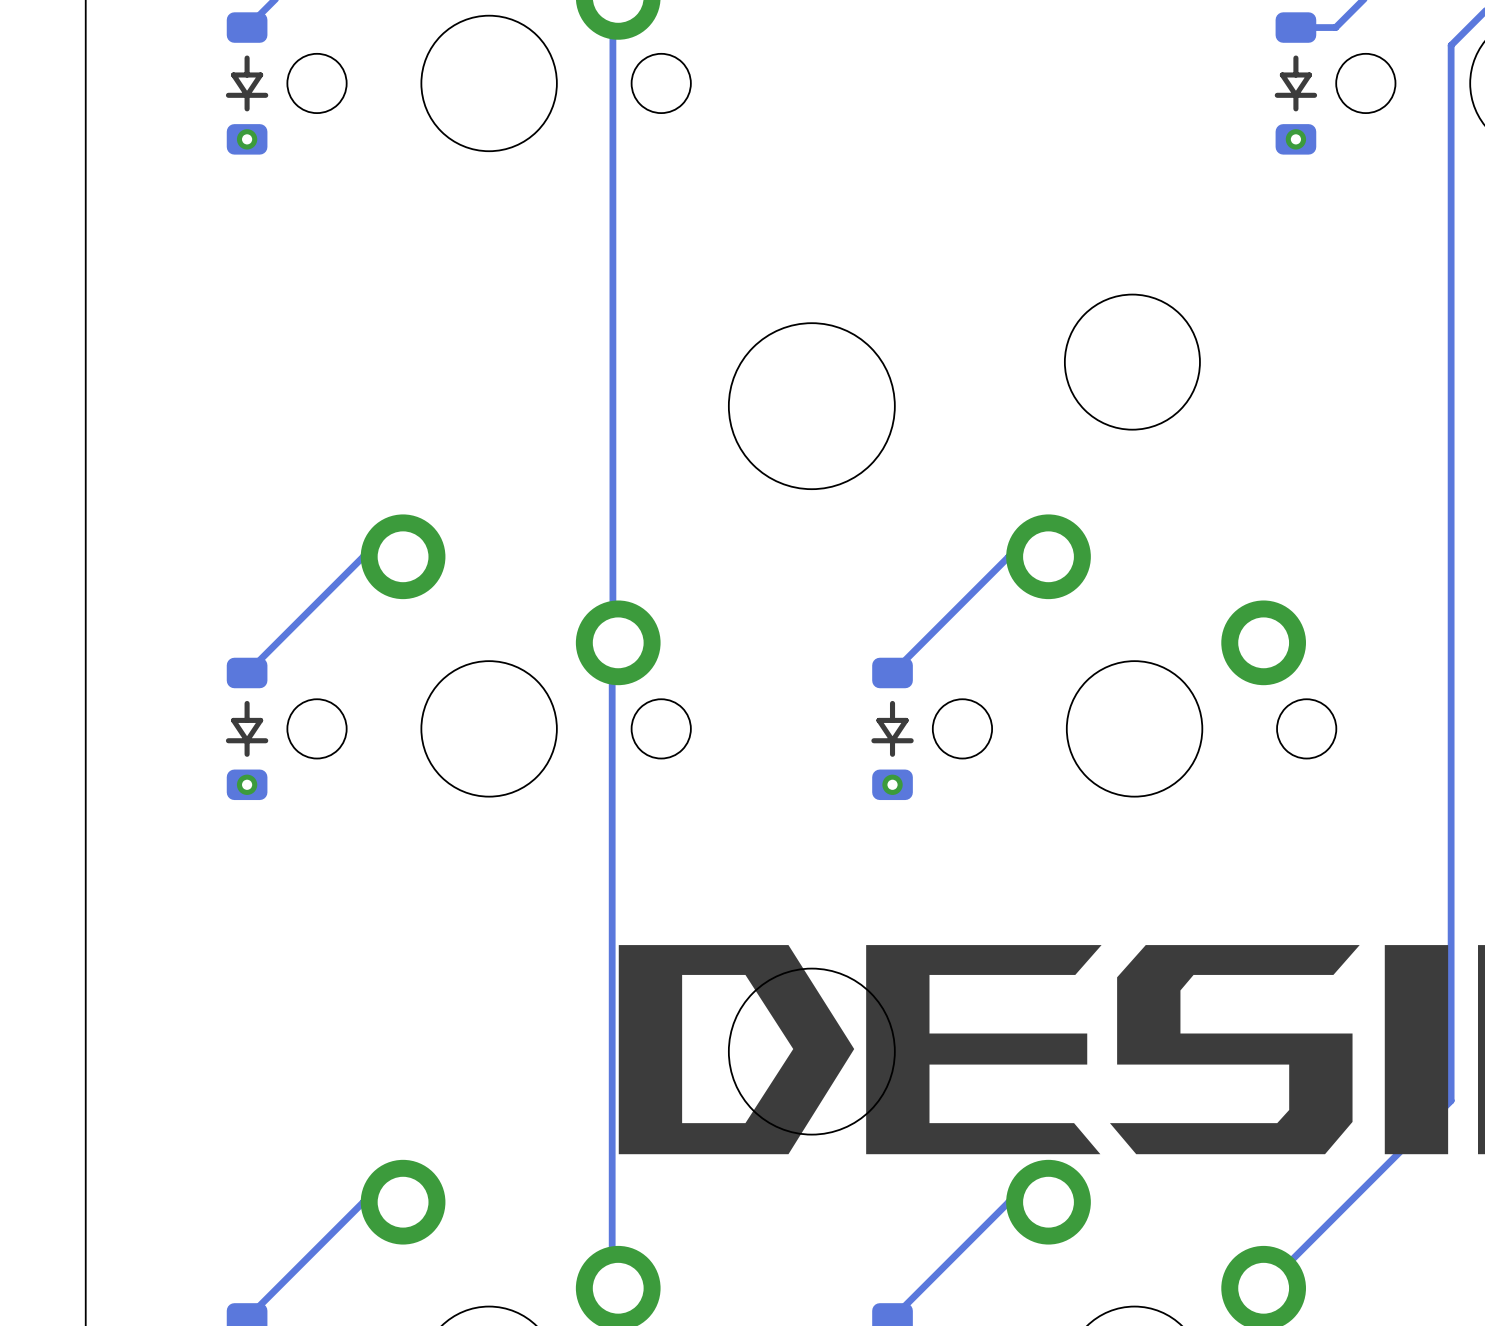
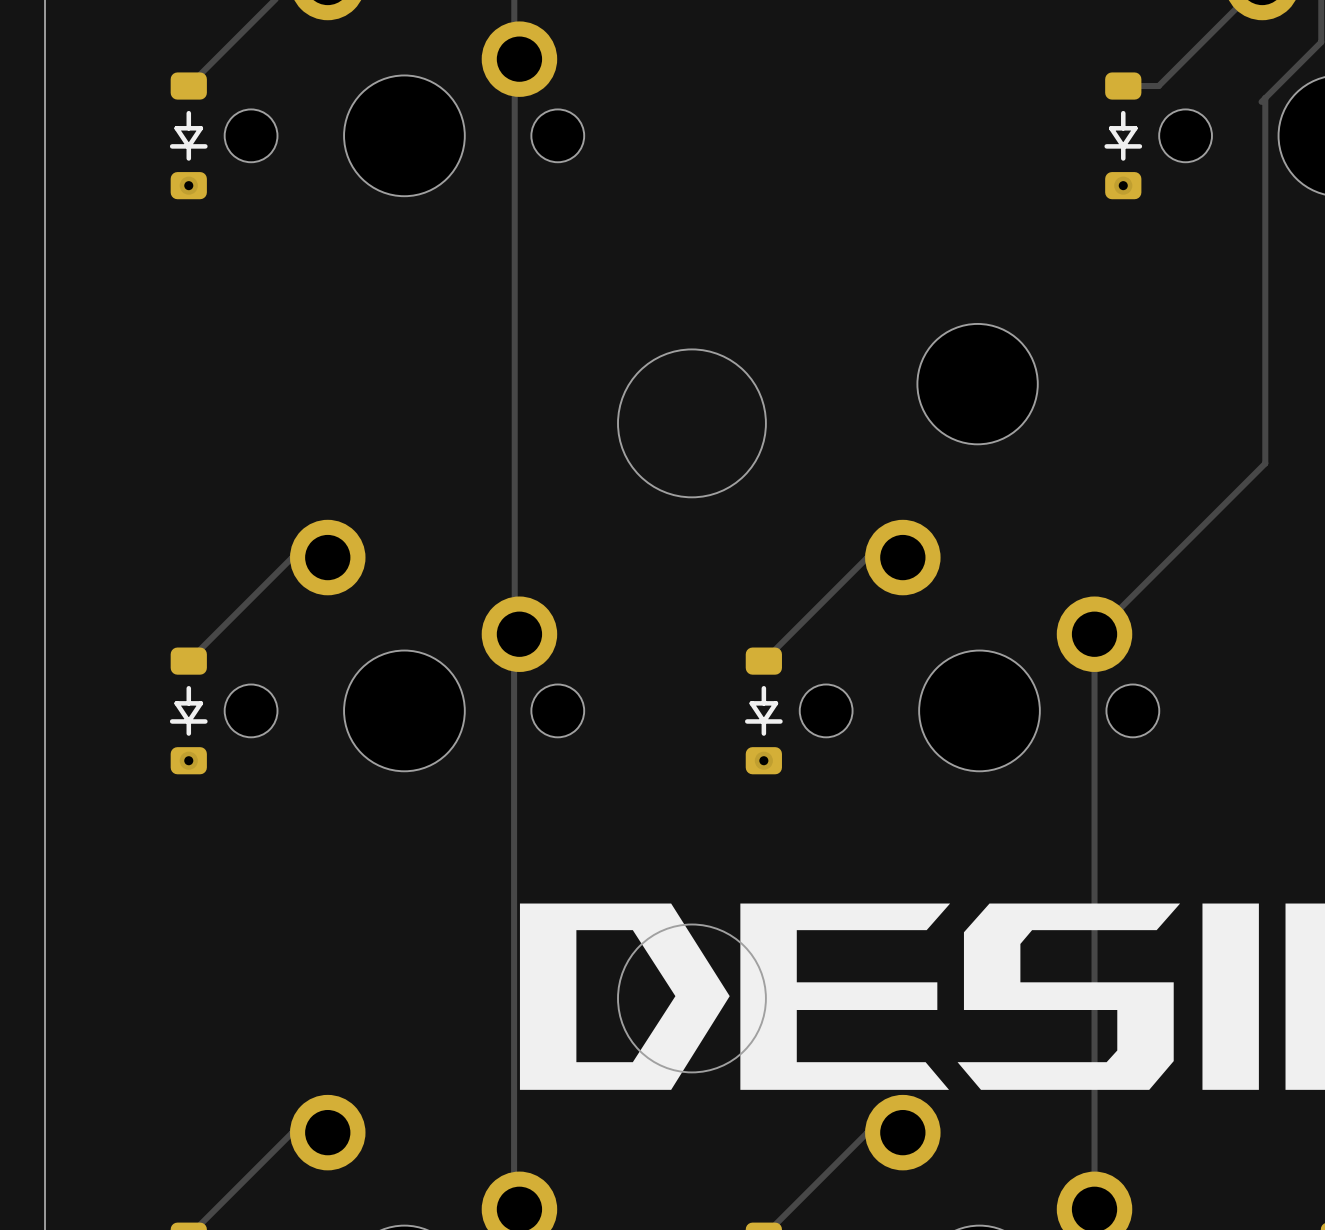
track: (1451, 45) (1451, 1100) (1263, 1288) -> (1265, 98) (1265, 463) (1094, 634) (1094, 1209)

